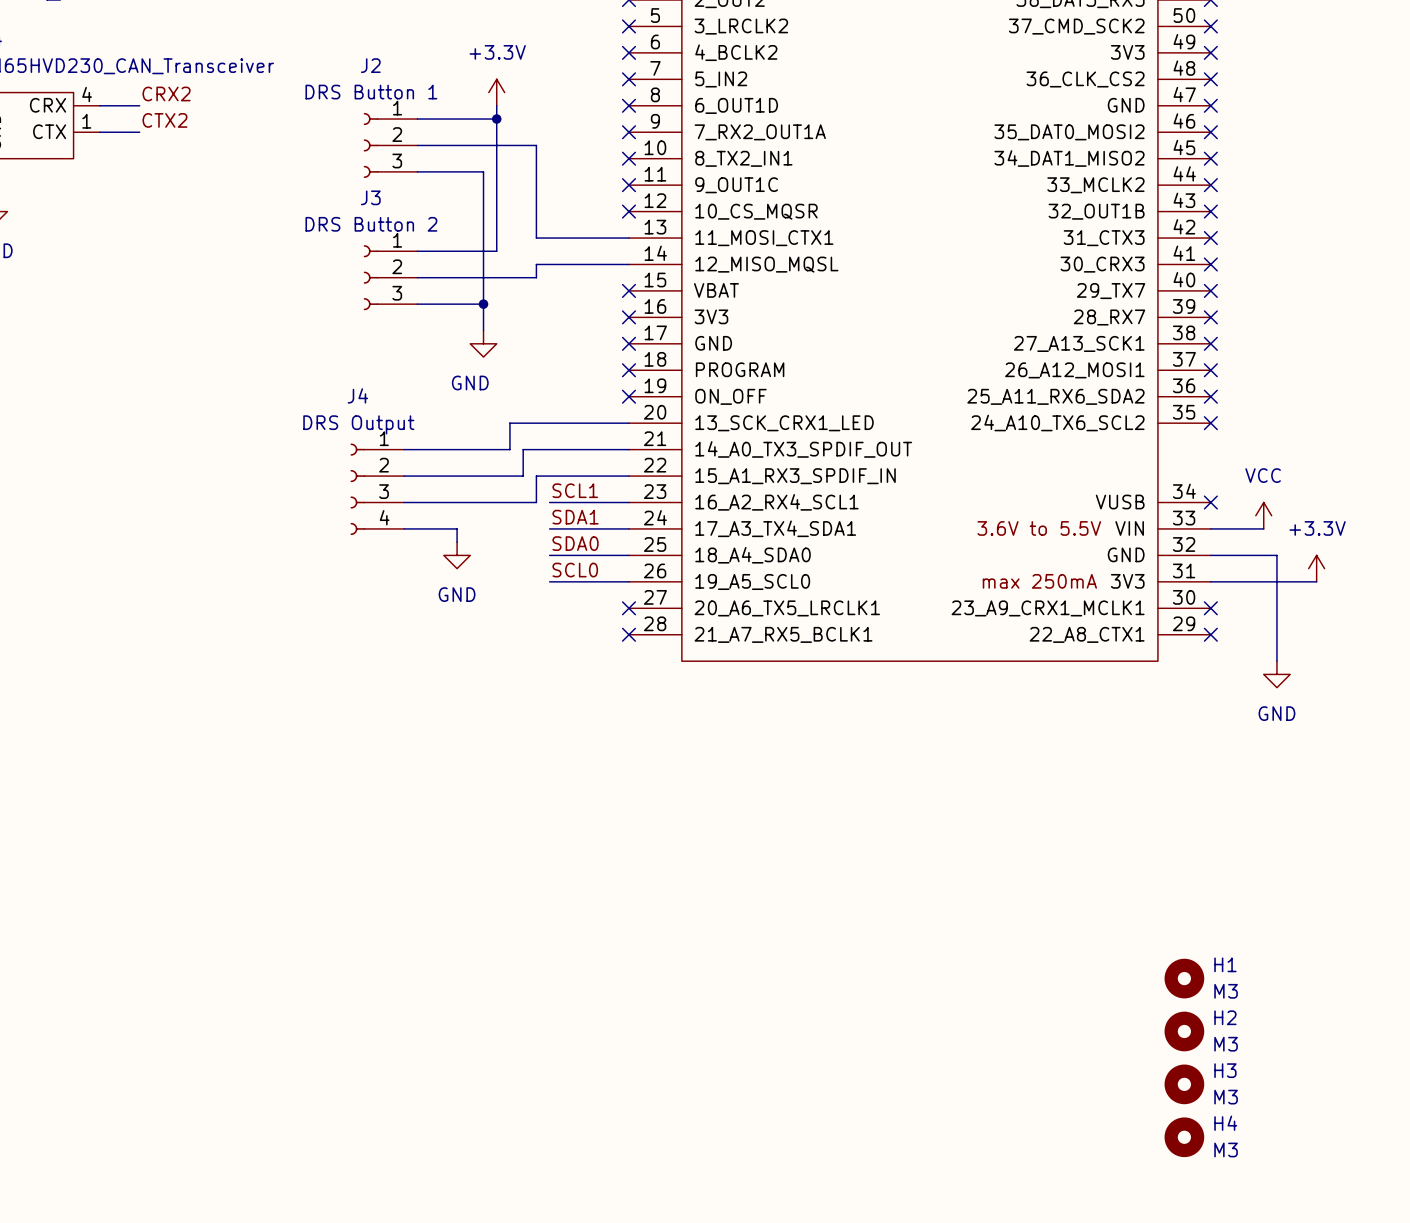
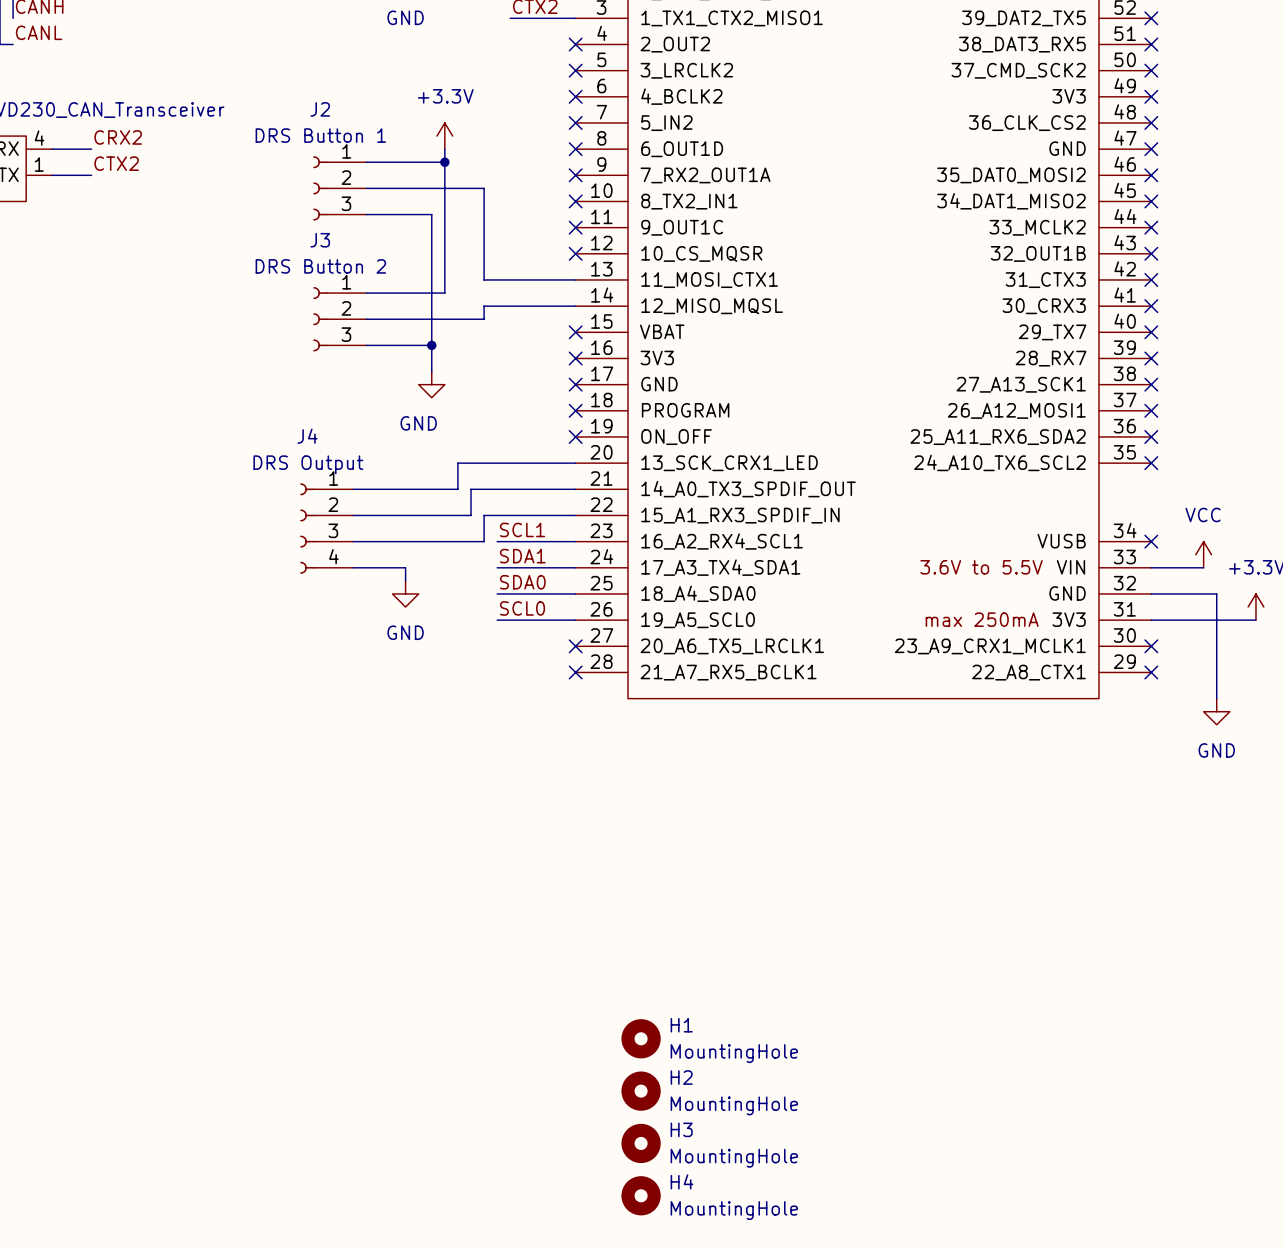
H1 position: (1184, 978) -> (641, 1038)
H1 value: M3 (1226, 991) -> MountingHole (734, 1053)
H2 position: (1184, 1031) -> (641, 1091)
H2 value: M3 (1226, 1044) -> MountingHole (734, 1105)
H3 position: (1184, 1084) -> (641, 1143)
H3 value: M3 (1226, 1097) -> MountingHole (734, 1158)
H4 position: (1184, 1137) -> (641, 1195)
H4 value: M3 (1226, 1150) -> MountingHole (734, 1210)

